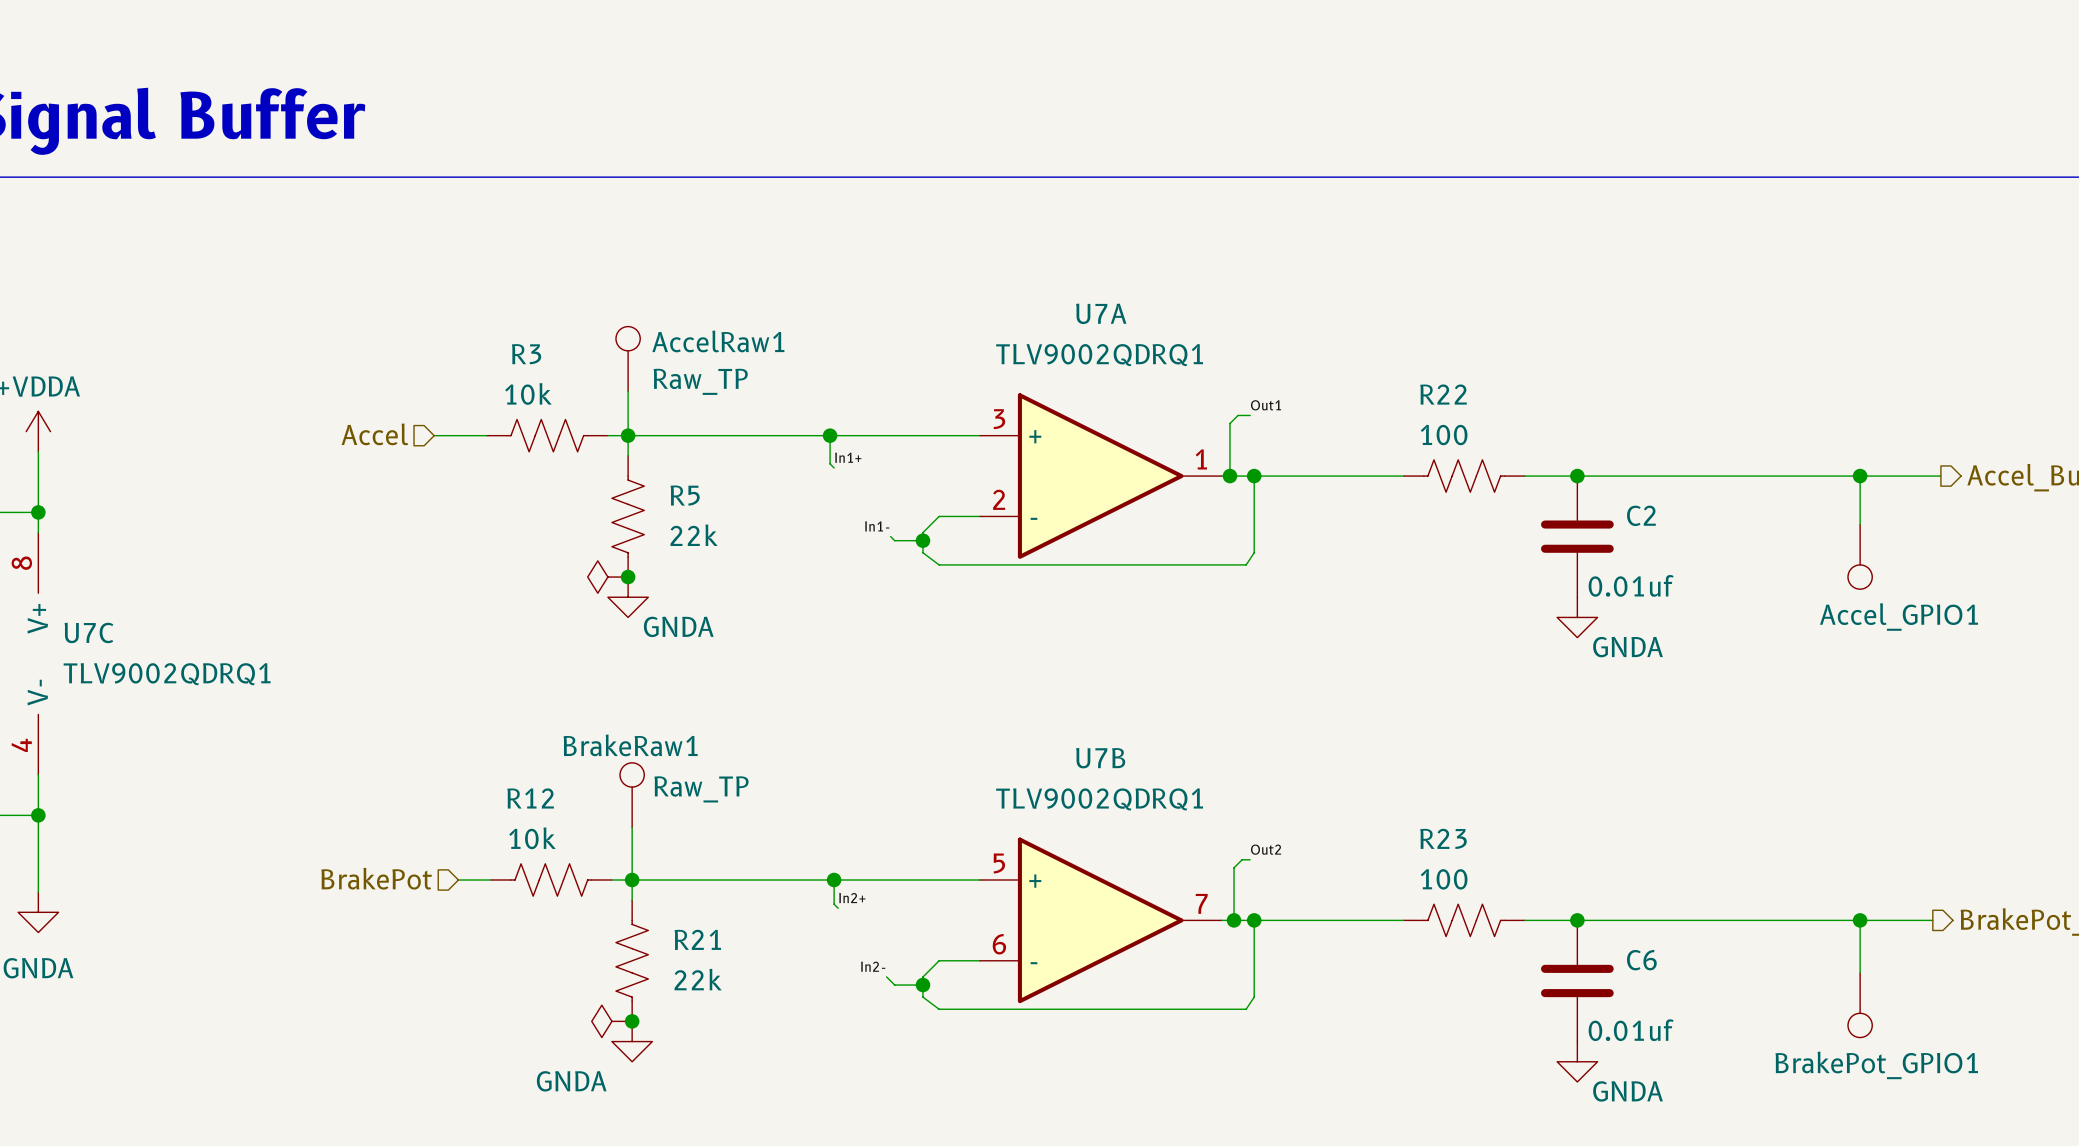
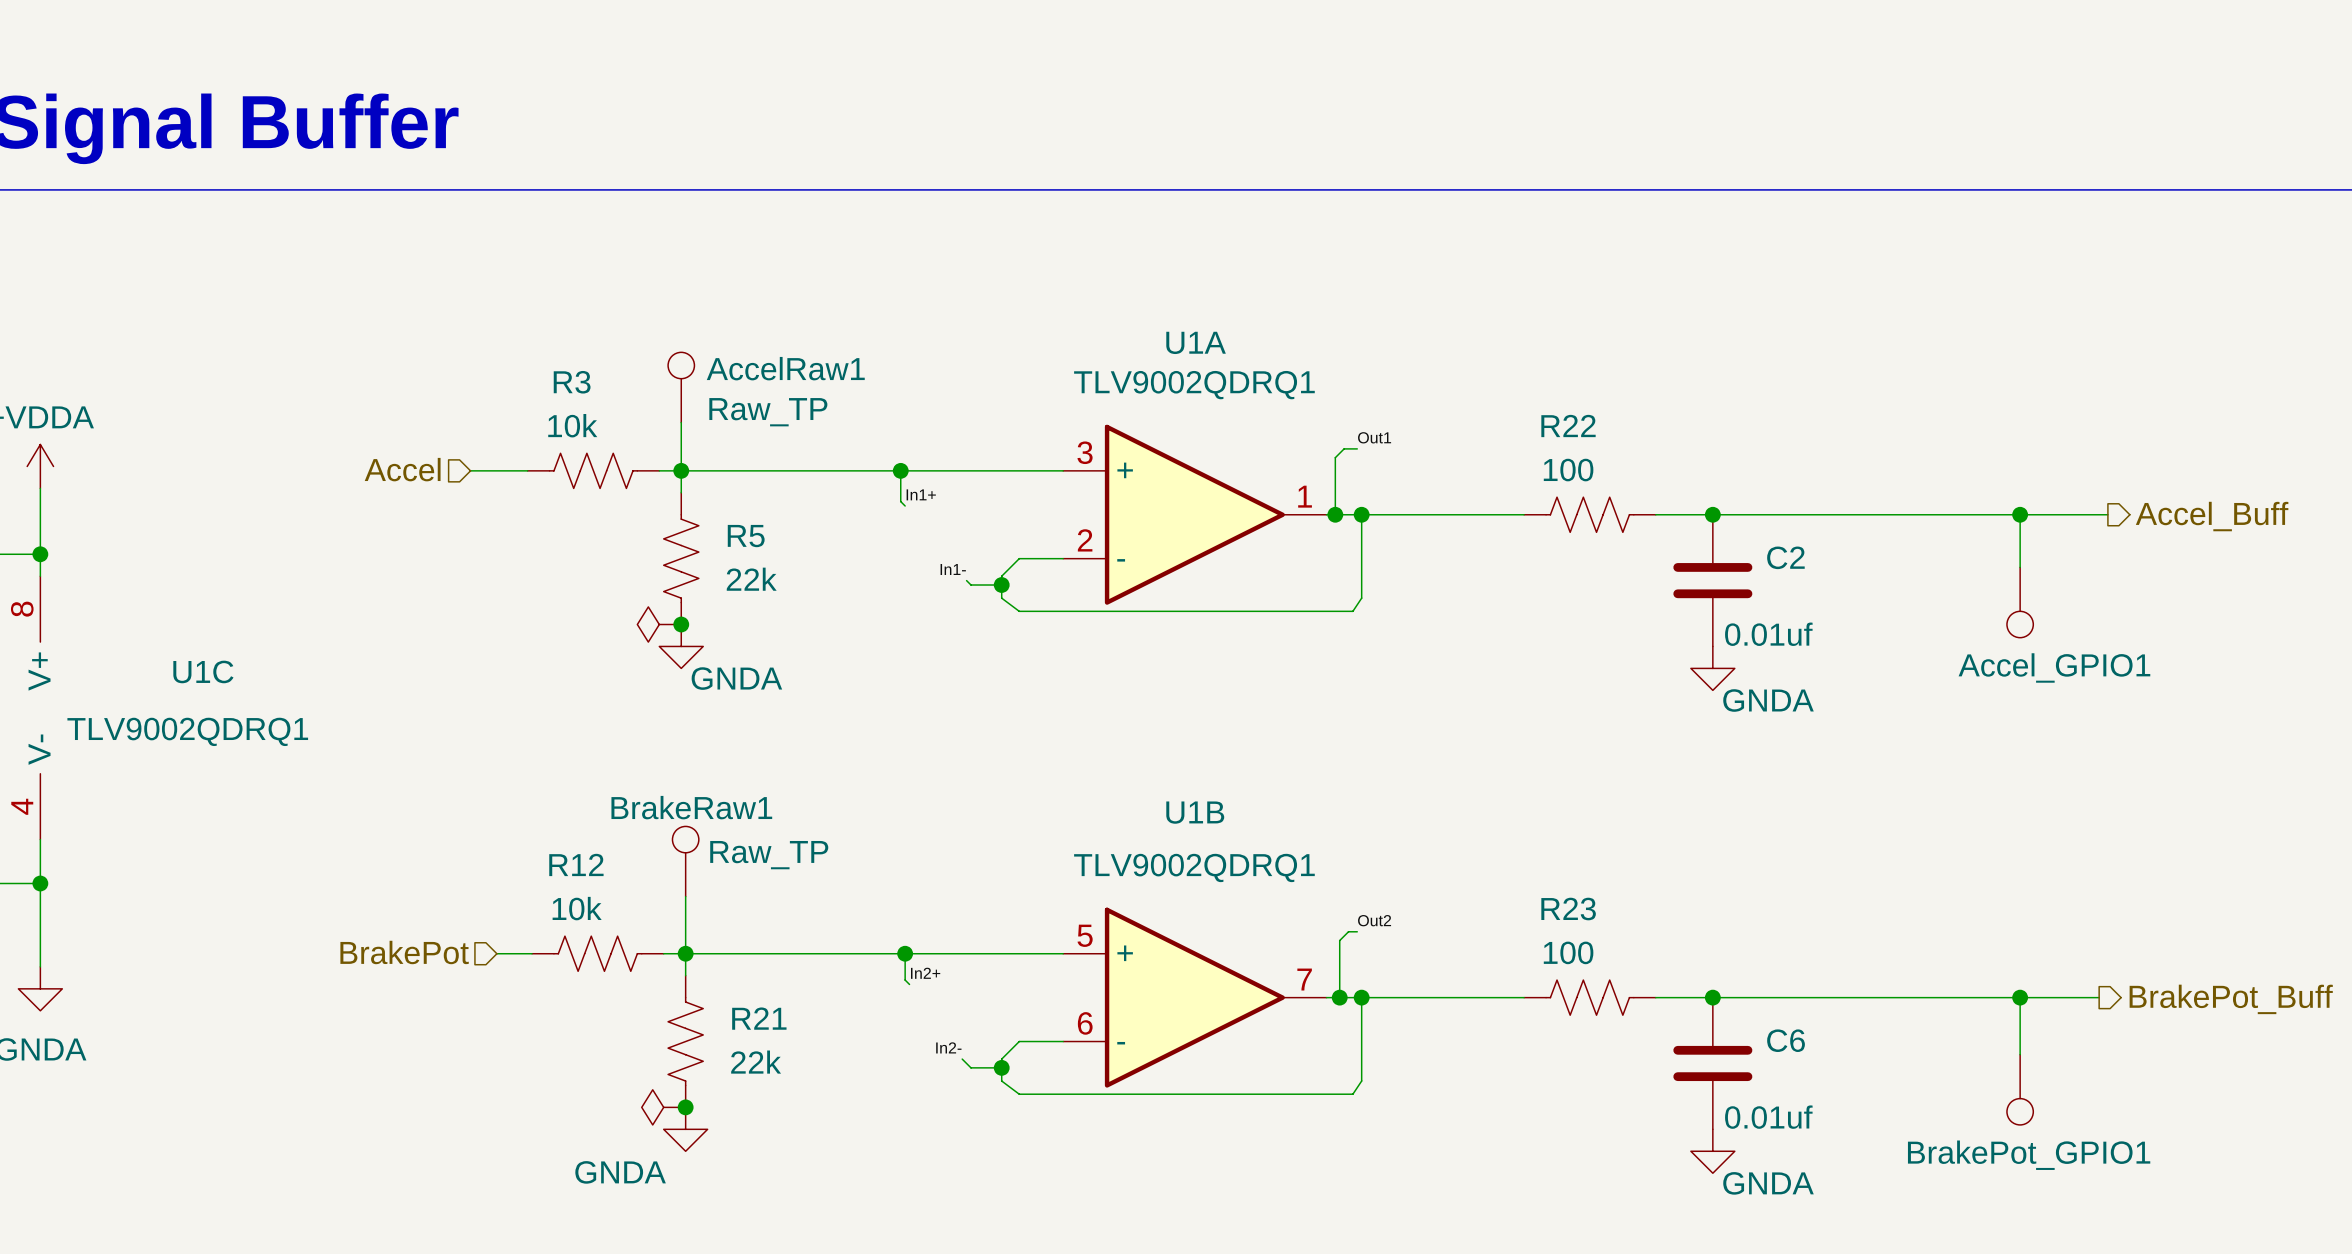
U7A name: U7A (1101, 313) -> U1A (1196, 342)
U7C name: U7C (88, 632) -> U1C (203, 671)
U7B name: U7B (1100, 758) -> U1B (1195, 812)

